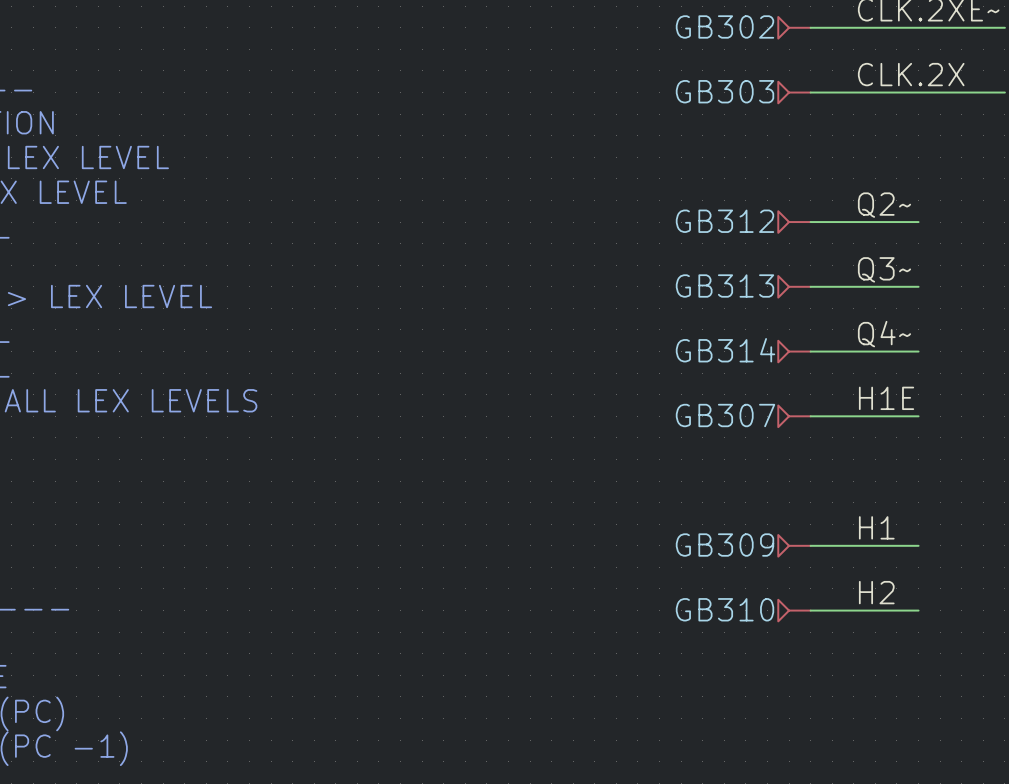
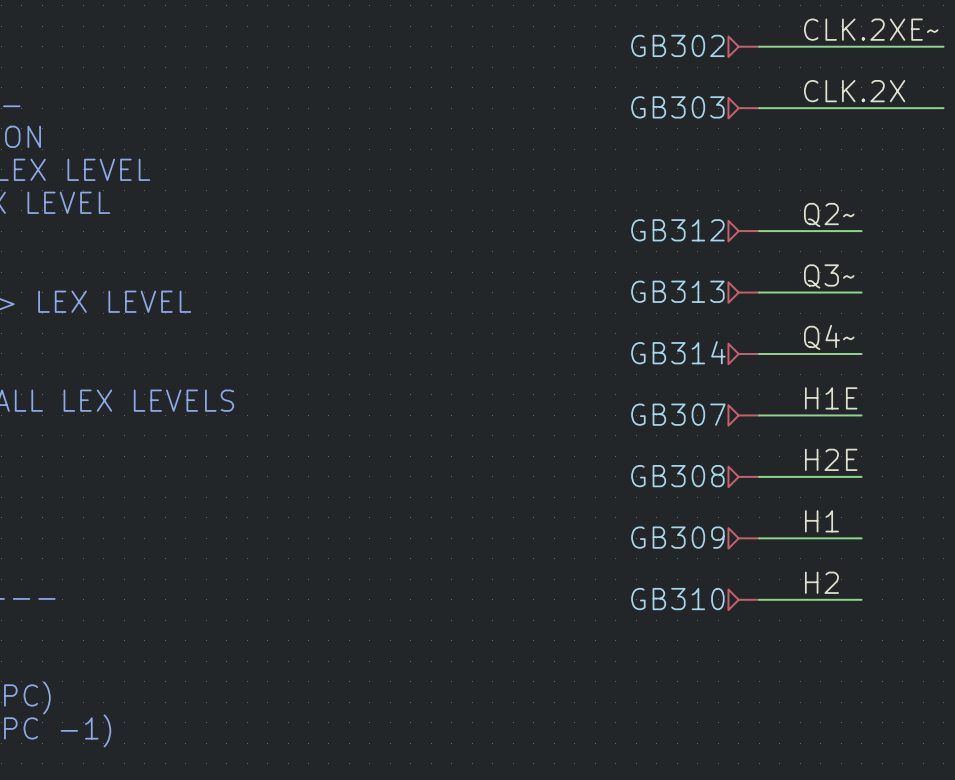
label: none -> H2E (831, 459)
GB308: none -> (743, 476)
wire: none -> (759, 476) (861, 476)

